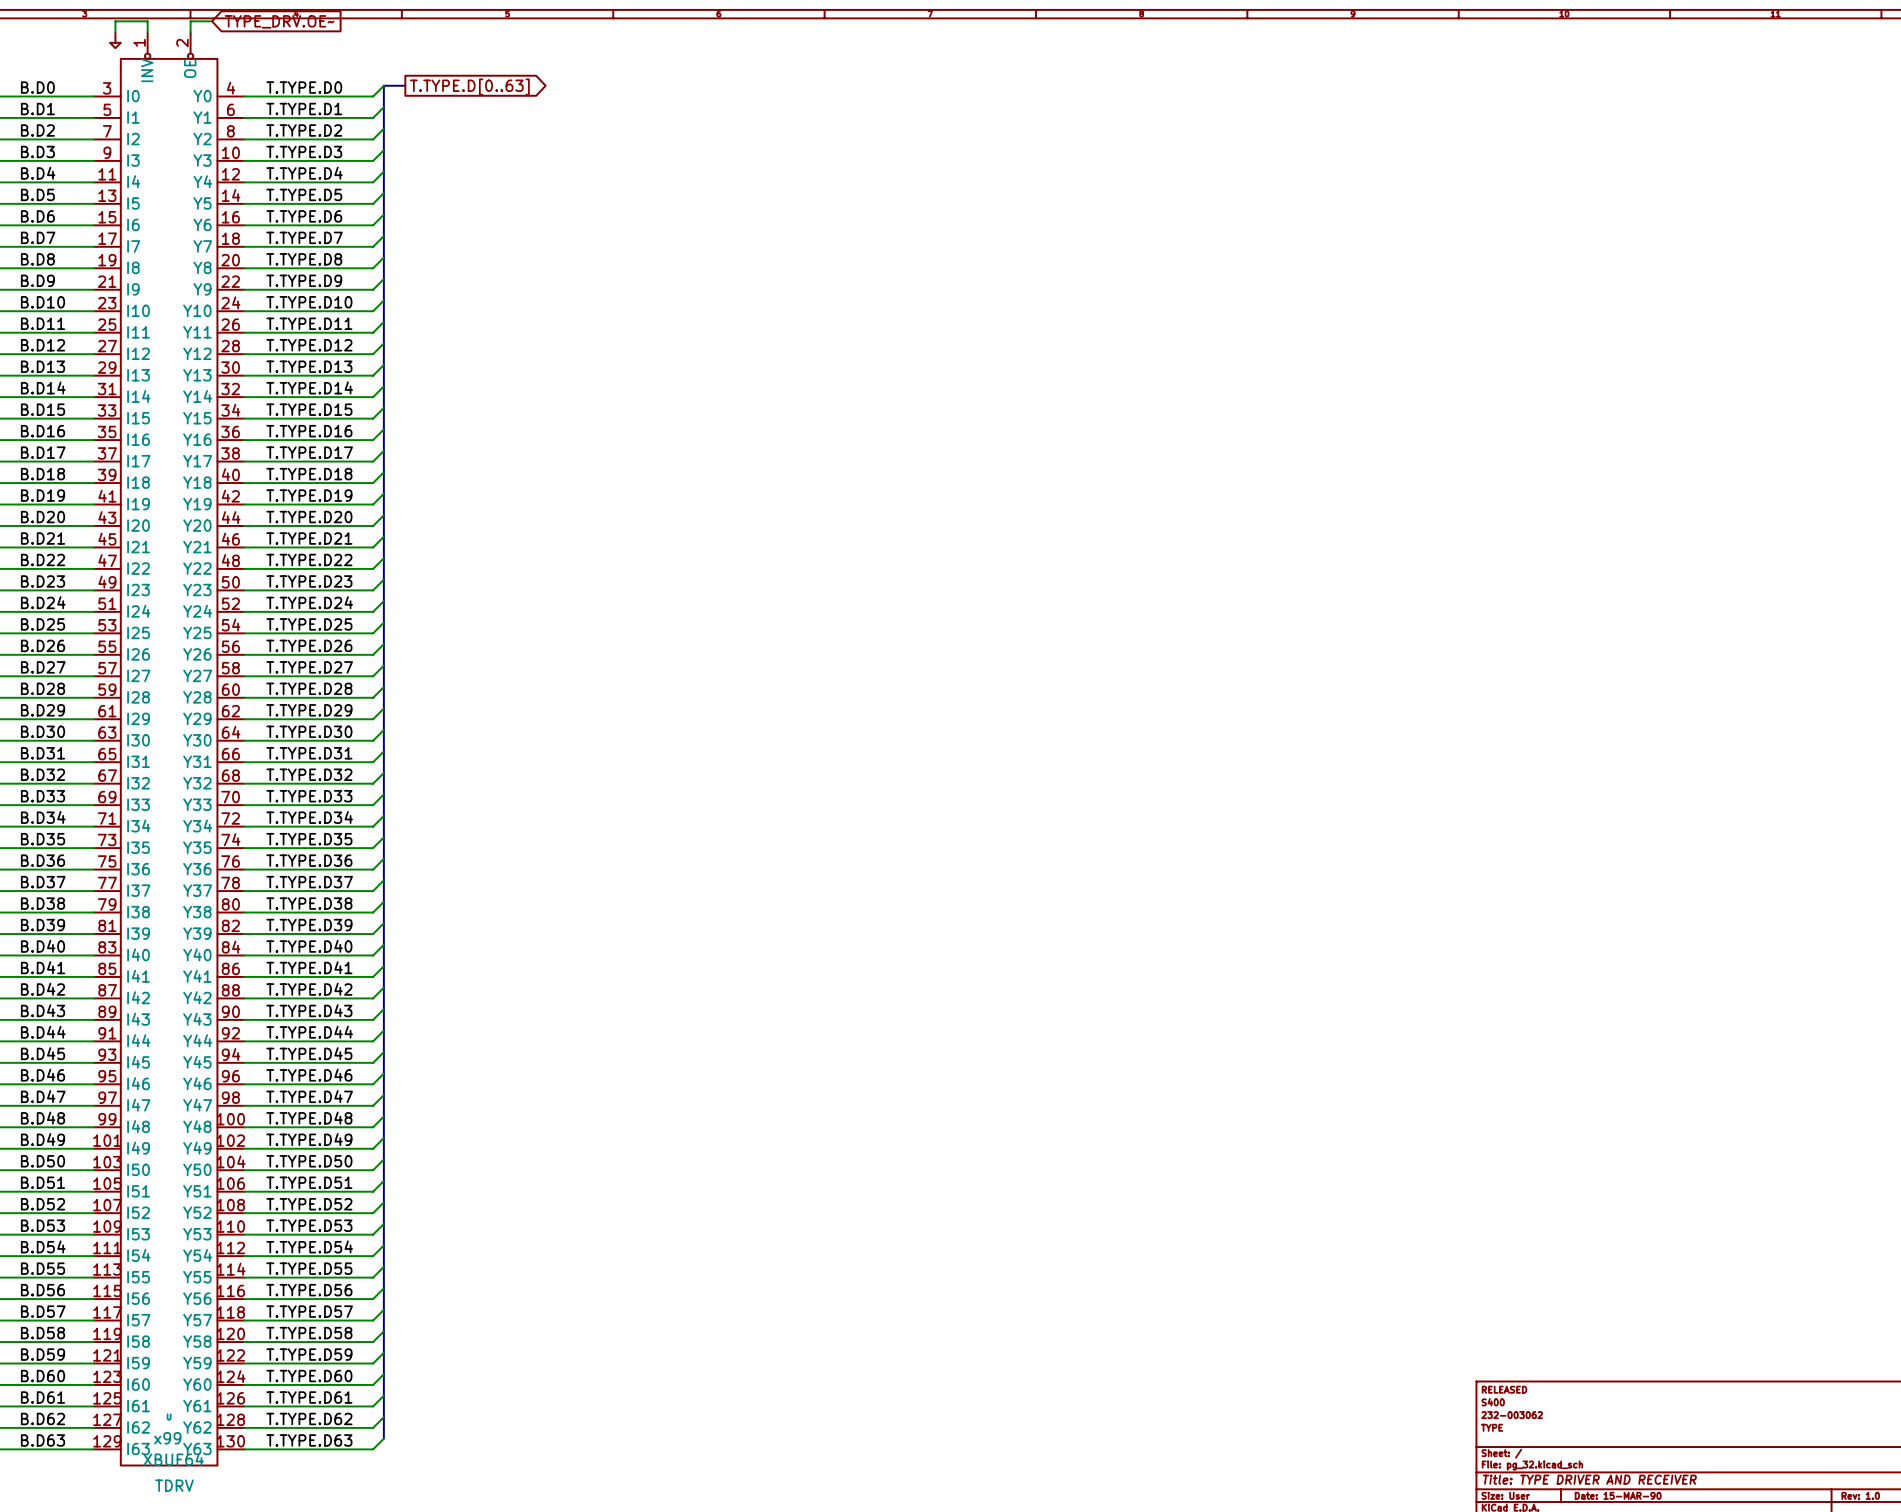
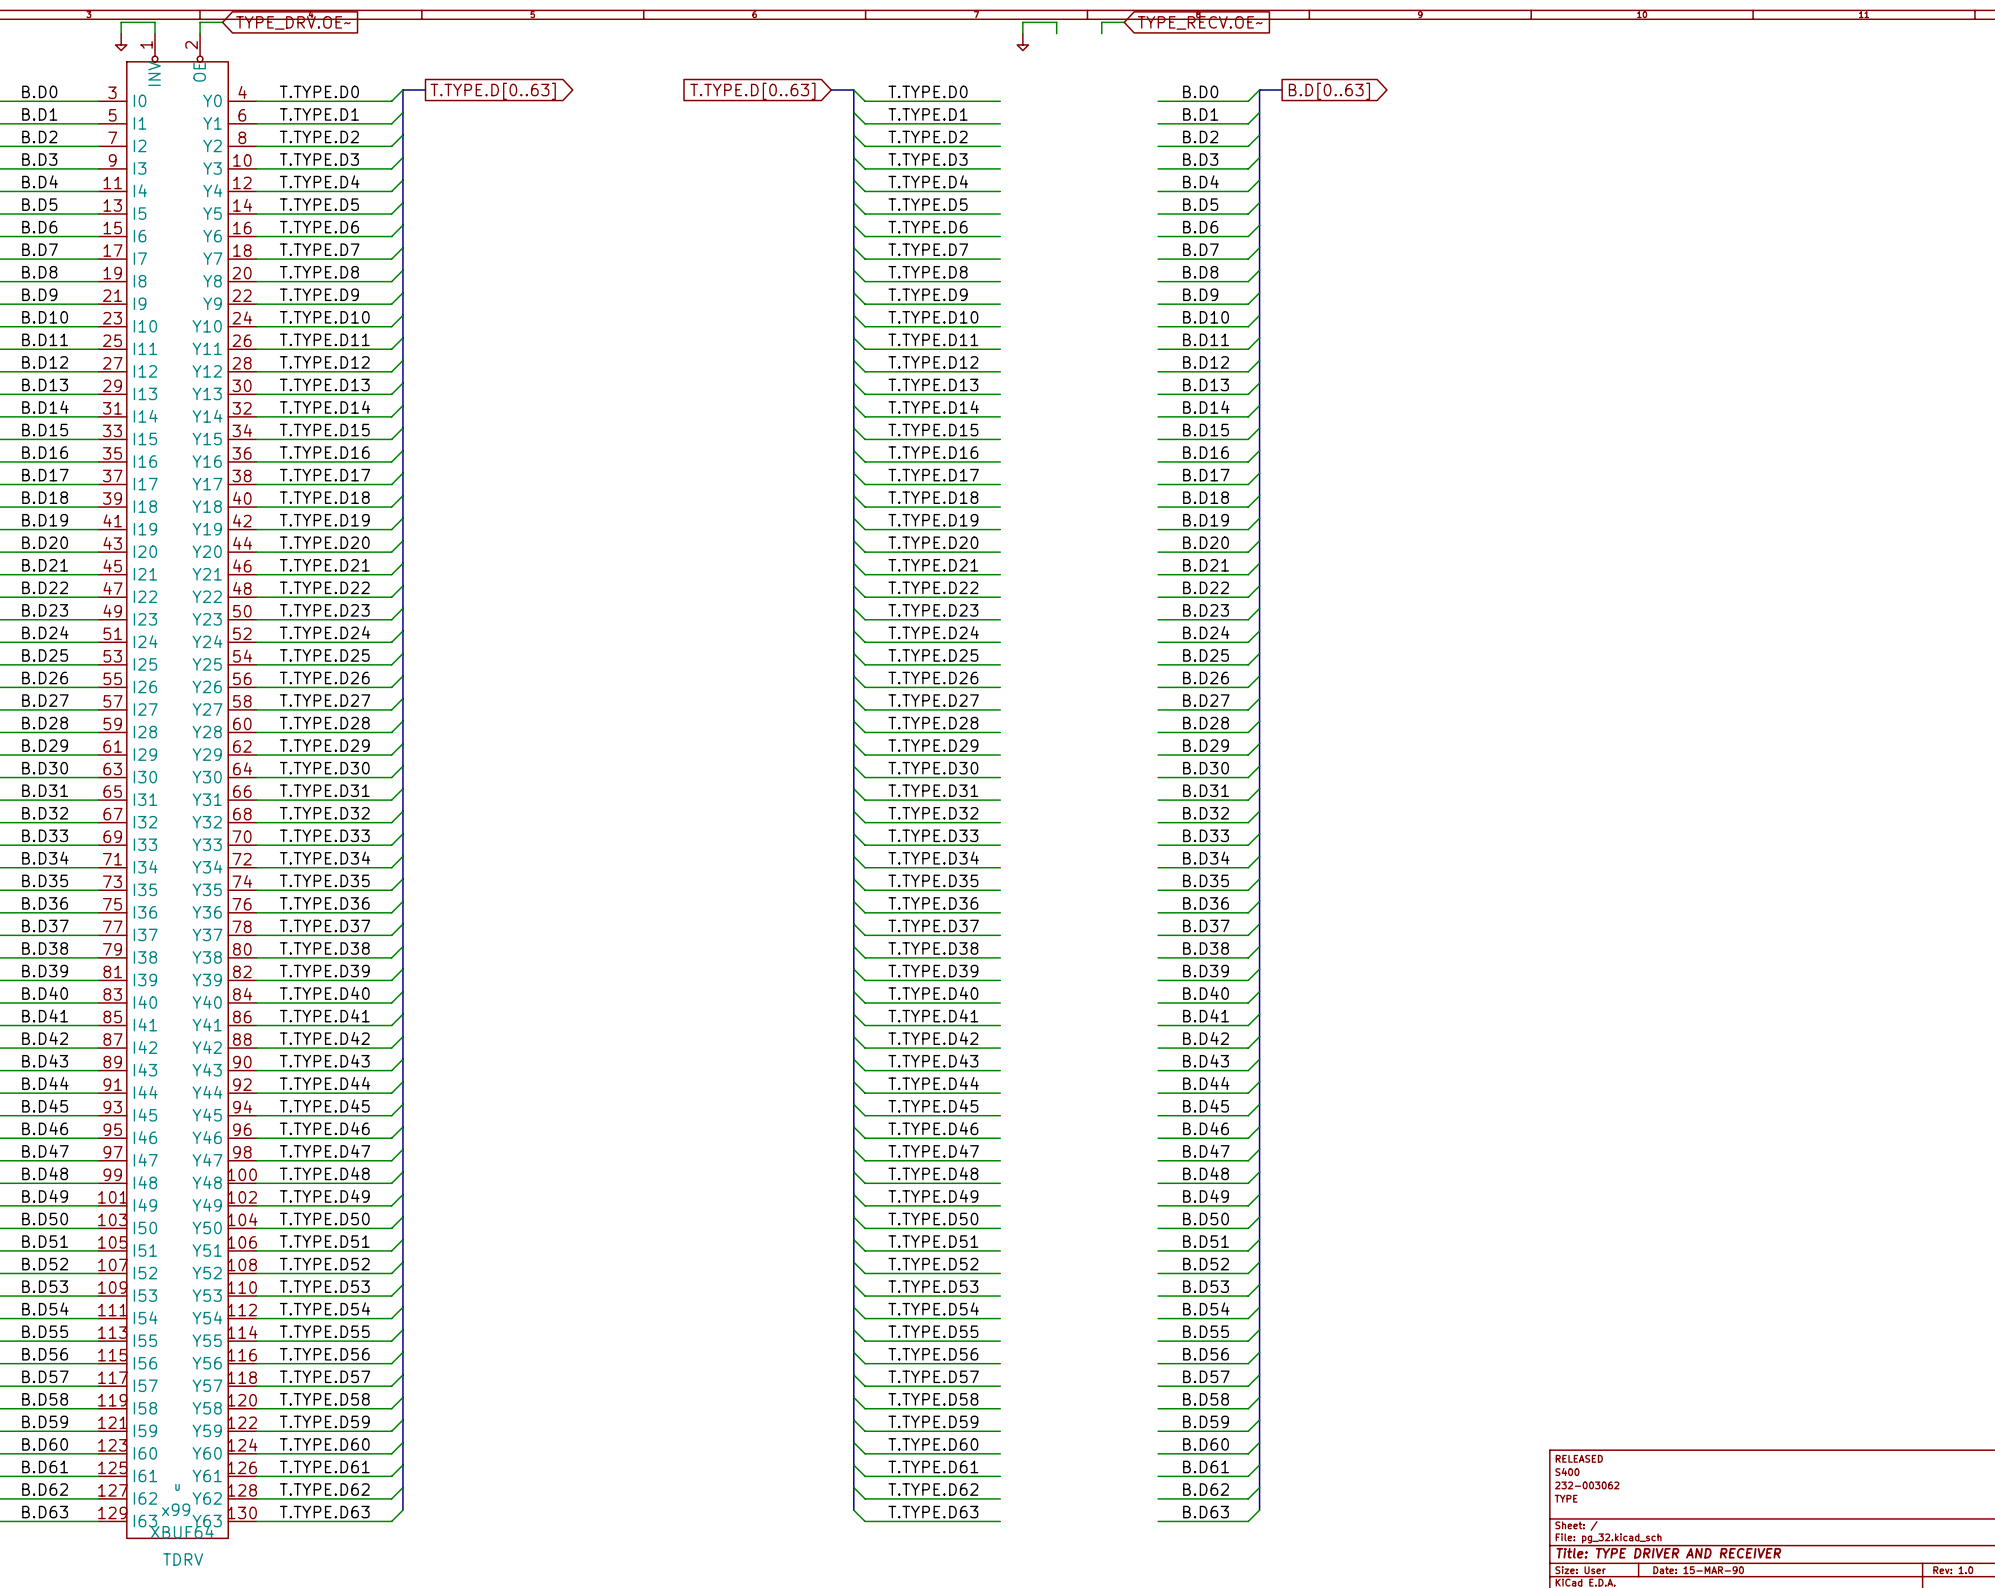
wire: none -> (1124, 22) (1101, 22) (1101, 33)
global label: none -> TYPE_RECV.OE~ (1200, 22)
wire: none -> (1022, 33) (1022, 22) (1056, 22) (1056, 33)
power symbol: none -> (1022, 42)
bus: none -> (831, 90) (853, 90) (853, 1510)
wire: none -> (853, 90) (865, 101) (1000, 101)
wire: none -> (1259, 90) (1248, 101) (1158, 101)
bus: none -> (1282, 90) (1259, 90) (1259, 1510)
global label: none -> T.TYPE.D[0..63] (752, 91)
label: none -> T.TYPE.D0 (928, 91)
label: none -> B.D0 (1200, 91)
global label: none -> B.D[0..63] (1329, 91)
wire: none -> (853, 112) (865, 123) (1000, 123)
wire: none -> (1259, 112) (1248, 123) (1158, 123)
label: none -> T.TYPE.D1 (928, 114)
label: none -> B.D1 (1200, 114)
wire: none -> (853, 135) (865, 146) (1000, 146)
wire: none -> (1259, 135) (1248, 146) (1158, 146)
label: none -> T.TYPE.D2 (928, 136)
label: none -> B.D2 (1200, 136)
wire: none -> (853, 157) (865, 168) (1000, 168)
wire: none -> (1259, 157) (1248, 168) (1158, 168)
label: none -> T.TYPE.D3 (928, 159)
label: none -> B.D3 (1200, 159)
wire: none -> (853, 180) (865, 191) (1000, 191)
wire: none -> (1259, 180) (1248, 191) (1158, 191)
label: none -> T.TYPE.D4 (928, 181)
label: none -> B.D4 (1200, 181)
wire: none -> (853, 202) (865, 214) (1000, 214)
wire: none -> (1259, 202) (1248, 214) (1158, 214)
label: none -> T.TYPE.D5 (928, 204)
label: none -> B.D5 (1200, 204)
wire: none -> (853, 225) (865, 236) (1000, 236)
wire: none -> (1259, 225) (1248, 236) (1158, 236)
label: none -> T.TYPE.D6 (928, 227)
label: none -> B.D6 (1200, 227)
wire: none -> (853, 247) (865, 259) (1000, 259)
wire: none -> (1259, 247) (1248, 259) (1158, 259)
label: none -> T.TYPE.D7 (928, 249)
label: none -> B.D7 (1200, 249)
wire: none -> (853, 270) (865, 281) (1000, 281)
wire: none -> (1259, 270) (1248, 281) (1158, 281)
label: none -> T.TYPE.D8 (928, 272)
label: none -> B.D8 (1200, 272)
wire: none -> (853, 292) (865, 304) (1000, 304)
wire: none -> (1259, 292) (1248, 304) (1158, 304)
label: none -> T.TYPE.D9 (928, 294)
label: none -> B.D9 (1200, 294)
wire: none -> (853, 315) (865, 326) (1000, 326)
wire: none -> (1259, 315) (1248, 326) (1158, 326)
label: none -> T.TYPE.D10 (933, 317)
label: none -> B.D10 (1206, 317)
wire: none -> (853, 337) (865, 349) (1000, 349)
wire: none -> (1259, 337) (1248, 349) (1158, 349)
label: none -> T.TYPE.D11 (933, 339)
label: none -> B.D11 (1206, 339)
wire: none -> (853, 360) (865, 371) (1000, 371)
wire: none -> (1259, 360) (1248, 371) (1158, 371)
label: none -> T.TYPE.D12 (933, 362)
label: none -> B.D12 (1206, 362)
wire: none -> (853, 383) (865, 394) (1000, 394)
wire: none -> (1259, 383) (1248, 394) (1158, 394)
label: none -> T.TYPE.D13 (933, 384)
label: none -> B.D13 (1206, 384)
wire: none -> (853, 405) (865, 416) (1000, 416)
wire: none -> (1259, 405) (1248, 416) (1158, 416)
label: none -> T.TYPE.D14 (933, 407)
label: none -> B.D14 (1206, 407)
wire: none -> (853, 428) (865, 439) (1000, 439)
wire: none -> (1259, 428) (1248, 439) (1158, 439)
label: none -> T.TYPE.D15 (933, 430)
label: none -> B.D15 (1206, 430)
wire: none -> (853, 450) (865, 461) (1000, 461)
wire: none -> (1259, 450) (1248, 461) (1158, 461)
label: none -> T.TYPE.D16 (933, 452)
label: none -> B.D16 (1206, 452)
wire: none -> (853, 473) (865, 484) (1000, 484)
wire: none -> (1259, 473) (1248, 484) (1158, 484)
label: none -> T.TYPE.D17 (933, 475)
label: none -> B.D17 (1206, 475)
wire: none -> (853, 495) (865, 507) (1000, 507)
wire: none -> (1259, 495) (1248, 507) (1158, 507)
label: none -> T.TYPE.D18 (933, 497)
label: none -> B.D18 (1206, 497)
wire: none -> (853, 518) (865, 529) (1000, 529)
wire: none -> (1259, 518) (1248, 529) (1158, 529)
label: none -> T.TYPE.D19 (933, 520)
label: none -> B.D19 (1206, 520)
wire: none -> (853, 540) (865, 552) (1000, 552)
wire: none -> (1259, 540) (1248, 552) (1158, 552)
label: none -> T.TYPE.D20 (933, 542)
label: none -> B.D20 (1206, 542)
wire: none -> (853, 563) (865, 574) (1000, 574)
wire: none -> (1259, 563) (1248, 574) (1158, 574)
label: none -> T.TYPE.D21 (933, 565)
label: none -> B.D21 (1206, 565)
wire: none -> (853, 585) (865, 597) (1000, 597)
wire: none -> (1259, 585) (1248, 597) (1158, 597)
label: none -> T.TYPE.D22 (933, 587)
label: none -> B.D22 (1206, 587)
wire: none -> (853, 608) (865, 619) (1000, 619)
wire: none -> (1259, 608) (1248, 619) (1158, 619)
label: none -> T.TYPE.D23 (933, 610)
label: none -> B.D23 (1206, 610)
wire: none -> (853, 631) (865, 642) (1000, 642)
wire: none -> (1259, 631) (1248, 642) (1158, 642)
label: none -> T.TYPE.D24 (933, 632)
label: none -> B.D24 (1206, 632)
wire: none -> (853, 653) (865, 664) (1000, 664)
wire: none -> (1259, 653) (1248, 664) (1158, 664)
label: none -> T.TYPE.D25 (933, 655)
label: none -> B.D25 (1206, 655)
wire: none -> (853, 676) (865, 687) (1000, 687)
wire: none -> (1259, 676) (1248, 687) (1158, 687)
label: none -> T.TYPE.D26 (933, 678)
label: none -> B.D26 (1206, 678)
wire: none -> (853, 698) (865, 709) (1000, 709)
wire: none -> (1259, 698) (1248, 709) (1158, 709)
label: none -> T.TYPE.D27 (933, 700)
label: none -> B.D27 (1206, 700)
wire: none -> (853, 721) (865, 732) (1000, 732)
wire: none -> (1259, 721) (1248, 732) (1158, 732)
label: none -> T.TYPE.D28 (933, 723)
label: none -> B.D28 (1206, 723)
wire: none -> (853, 743) (865, 755) (1000, 755)
wire: none -> (1259, 743) (1248, 755) (1158, 755)
label: none -> T.TYPE.D29 (933, 745)
label: none -> B.D29 (1206, 745)
wire: none -> (853, 766) (865, 777) (1000, 777)
wire: none -> (1259, 766) (1248, 777) (1158, 777)
label: none -> T.TYPE.D30 (933, 768)
label: none -> B.D30 (1206, 768)
wire: none -> (853, 788) (865, 800) (1000, 800)
wire: none -> (1259, 788) (1248, 800) (1158, 800)
label: none -> T.TYPE.D31 (933, 790)
label: none -> B.D31 (1206, 790)
wire: none -> (853, 811) (865, 822) (1000, 822)
wire: none -> (1259, 811) (1248, 822) (1158, 822)
label: none -> T.TYPE.D32 (933, 813)
label: none -> B.D32 (1206, 813)
wire: none -> (853, 833) (865, 845) (1000, 845)
wire: none -> (1259, 833) (1248, 845) (1158, 845)
label: none -> T.TYPE.D33 (933, 835)
label: none -> B.D33 (1206, 835)
wire: none -> (853, 856) (865, 867) (1000, 867)
wire: none -> (1259, 856) (1248, 867) (1158, 867)
label: none -> T.TYPE.D34 (933, 858)
label: none -> B.D34 (1206, 858)
wire: none -> (853, 878) (865, 890) (1000, 890)
wire: none -> (1259, 878) (1248, 890) (1158, 890)
label: none -> T.TYPE.D35 (933, 880)
label: none -> B.D35 (1206, 880)
wire: none -> (853, 901) (865, 912) (1000, 912)
wire: none -> (1259, 901) (1248, 912) (1158, 912)
label: none -> T.TYPE.D36 (933, 903)
label: none -> B.D36 (1206, 903)
wire: none -> (853, 924) (865, 935) (1000, 935)
wire: none -> (1259, 924) (1248, 935) (1158, 935)
label: none -> T.TYPE.D37 (933, 925)
label: none -> B.D37 (1206, 925)
wire: none -> (853, 946) (865, 957) (1000, 957)
wire: none -> (1259, 946) (1248, 957) (1158, 957)
label: none -> T.TYPE.D38 (933, 948)
label: none -> B.D38 (1206, 948)
wire: none -> (853, 969) (865, 980) (1000, 980)
wire: none -> (1259, 969) (1248, 980) (1158, 980)
label: none -> T.TYPE.D39 (933, 971)
label: none -> B.D39 (1206, 971)
wire: none -> (853, 991) (865, 1002) (1000, 1002)
wire: none -> (1259, 991) (1248, 1002) (1158, 1002)
label: none -> T.TYPE.D40 (933, 993)
label: none -> B.D40 (1206, 993)
wire: none -> (853, 1014) (865, 1025) (1000, 1025)
wire: none -> (1259, 1014) (1248, 1025) (1158, 1025)
label: none -> T.TYPE.D41 (933, 1015)
label: none -> B.D41 (1206, 1015)
wire: none -> (853, 1036) (865, 1048) (1000, 1048)
wire: none -> (1259, 1036) (1248, 1048) (1158, 1048)
label: none -> T.TYPE.D42 (933, 1038)
label: none -> B.D42 (1206, 1038)
wire: none -> (853, 1059) (865, 1070) (1000, 1070)
wire: none -> (1259, 1059) (1248, 1070) (1158, 1070)
label: none -> T.TYPE.D43 (933, 1060)
label: none -> B.D43 (1206, 1060)
wire: none -> (853, 1081) (865, 1093) (1000, 1093)
wire: none -> (1259, 1081) (1248, 1093) (1158, 1093)
label: none -> T.TYPE.D44 (933, 1083)
label: none -> B.D44 (1206, 1083)
wire: none -> (853, 1104) (865, 1115) (1000, 1115)
wire: none -> (1259, 1104) (1248, 1115) (1158, 1115)
label: none -> T.TYPE.D45 (933, 1106)
label: none -> B.D45 (1206, 1106)
wire: none -> (853, 1126) (865, 1138) (1000, 1138)
wire: none -> (1259, 1126) (1248, 1138) (1158, 1138)
label: none -> T.TYPE.D46 (933, 1128)
label: none -> B.D46 (1206, 1128)
wire: none -> (853, 1149) (865, 1160) (1000, 1160)
wire: none -> (1259, 1149) (1248, 1160) (1158, 1160)
label: none -> T.TYPE.D47 (933, 1151)
label: none -> B.D47 (1206, 1151)
wire: none -> (853, 1172) (865, 1183) (1000, 1183)
wire: none -> (1259, 1172) (1248, 1183) (1158, 1183)
label: none -> T.TYPE.D48 (933, 1173)
label: none -> B.D48 (1206, 1173)
wire: none -> (853, 1194) (865, 1205) (1000, 1205)
wire: none -> (1259, 1194) (1248, 1205) (1158, 1205)
label: none -> T.TYPE.D49 (933, 1196)
label: none -> B.D49 (1206, 1196)
wire: none -> (853, 1217) (865, 1228) (1000, 1228)
wire: none -> (1259, 1217) (1248, 1228) (1158, 1228)
label: none -> T.TYPE.D50 (933, 1219)
label: none -> B.D50 (1206, 1219)
wire: none -> (853, 1239) (865, 1250) (1000, 1250)
wire: none -> (1259, 1239) (1248, 1250) (1158, 1250)
label: none -> T.TYPE.D51 (933, 1241)
label: none -> B.D51 (1206, 1241)
wire: none -> (853, 1262) (865, 1273) (1000, 1273)
wire: none -> (1259, 1262) (1248, 1273) (1158, 1273)
label: none -> T.TYPE.D52 (933, 1264)
label: none -> B.D52 (1206, 1264)
wire: none -> (853, 1284) (865, 1296) (1000, 1296)
wire: none -> (1259, 1284) (1248, 1296) (1158, 1296)
label: none -> T.TYPE.D53 (933, 1286)
label: none -> B.D53 (1206, 1286)
wire: none -> (853, 1307) (865, 1318) (1000, 1318)
wire: none -> (1259, 1307) (1248, 1318) (1158, 1318)
label: none -> T.TYPE.D54 (933, 1308)
label: none -> B.D54 (1206, 1308)
wire: none -> (853, 1329) (865, 1341) (1000, 1341)
wire: none -> (1259, 1329) (1248, 1341) (1158, 1341)
label: none -> T.TYPE.D55 (933, 1331)
label: none -> B.D55 (1206, 1331)
wire: none -> (853, 1352) (865, 1363) (1000, 1363)
wire: none -> (1259, 1352) (1248, 1363) (1158, 1363)
label: none -> T.TYPE.D56 (933, 1354)
label: none -> B.D56 (1206, 1354)
wire: none -> (853, 1374) (865, 1386) (1000, 1386)
wire: none -> (1259, 1374) (1248, 1386) (1158, 1386)
label: none -> T.TYPE.D57 (933, 1376)
label: none -> B.D57 (1206, 1376)
wire: none -> (853, 1397) (865, 1408) (1000, 1408)
wire: none -> (1259, 1397) (1248, 1408) (1158, 1408)
label: none -> T.TYPE.D58 (933, 1399)
label: none -> B.D58 (1206, 1399)
wire: none -> (853, 1420) (865, 1431) (1000, 1431)
wire: none -> (1259, 1420) (1248, 1431) (1158, 1431)
label: none -> T.TYPE.D59 (933, 1421)
label: none -> B.D59 (1206, 1421)
wire: none -> (853, 1442) (865, 1453) (1000, 1453)
wire: none -> (1259, 1442) (1248, 1453) (1158, 1453)
label: none -> T.TYPE.D60 (933, 1444)
label: none -> B.D60 (1206, 1444)
wire: none -> (853, 1465) (865, 1476) (1000, 1476)
wire: none -> (1259, 1465) (1248, 1476) (1158, 1476)
label: none -> T.TYPE.D61 (933, 1466)
label: none -> B.D61 (1206, 1466)
wire: none -> (853, 1487) (865, 1498) (1000, 1498)
wire: none -> (1259, 1487) (1248, 1498) (1158, 1498)
label: none -> T.TYPE.D62 (933, 1489)
label: none -> B.D62 (1206, 1489)
wire: none -> (853, 1510) (865, 1521) (1000, 1521)
wire: none -> (1259, 1510) (1248, 1521) (1158, 1521)
label: none -> T.TYPE.D63 (933, 1512)
label: none -> B.D63 (1206, 1512)

